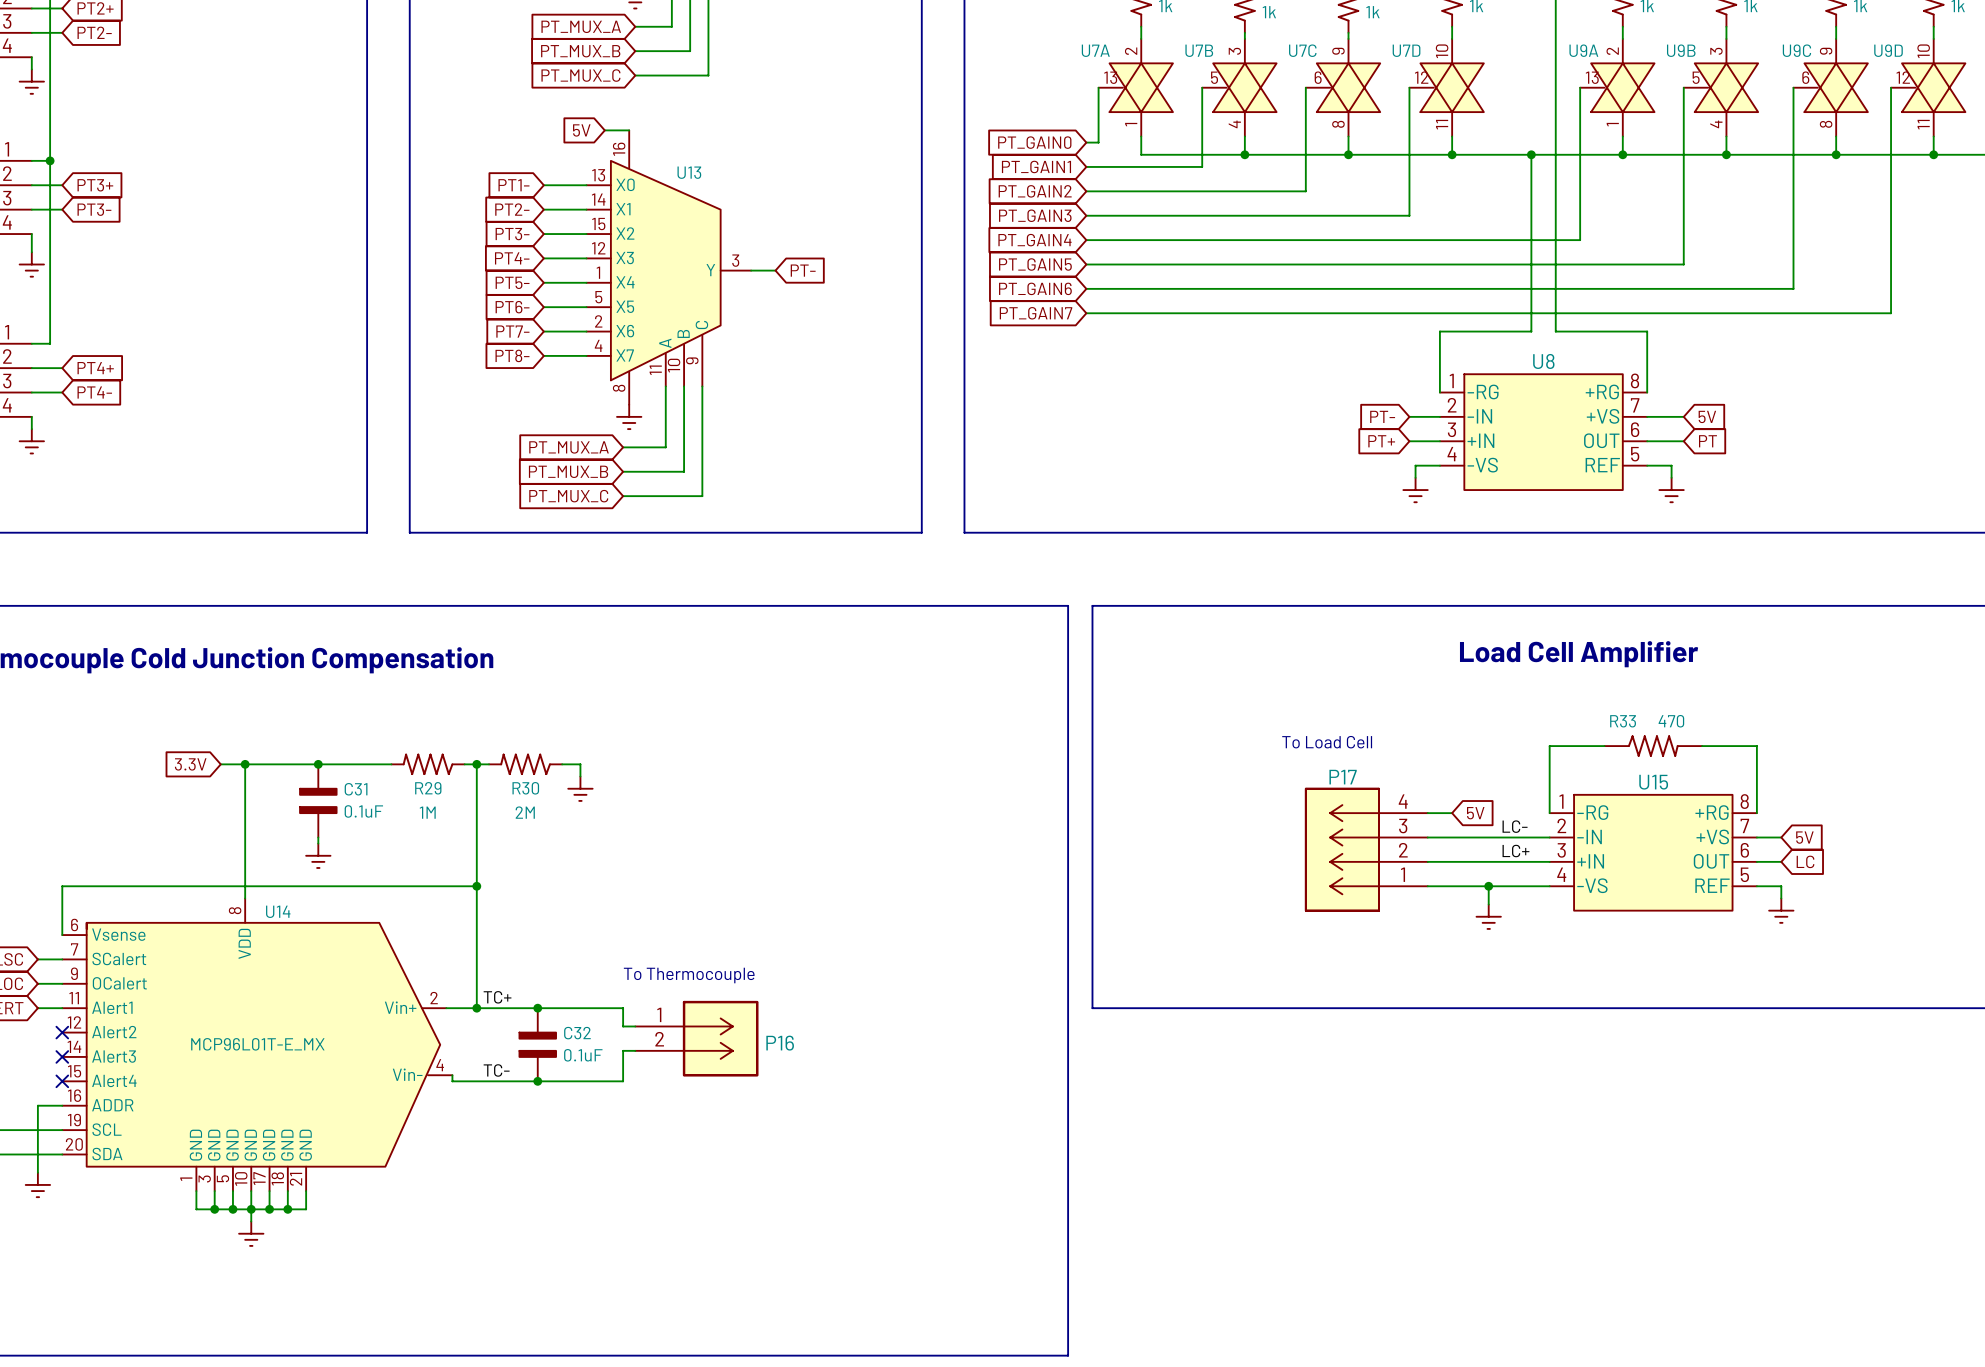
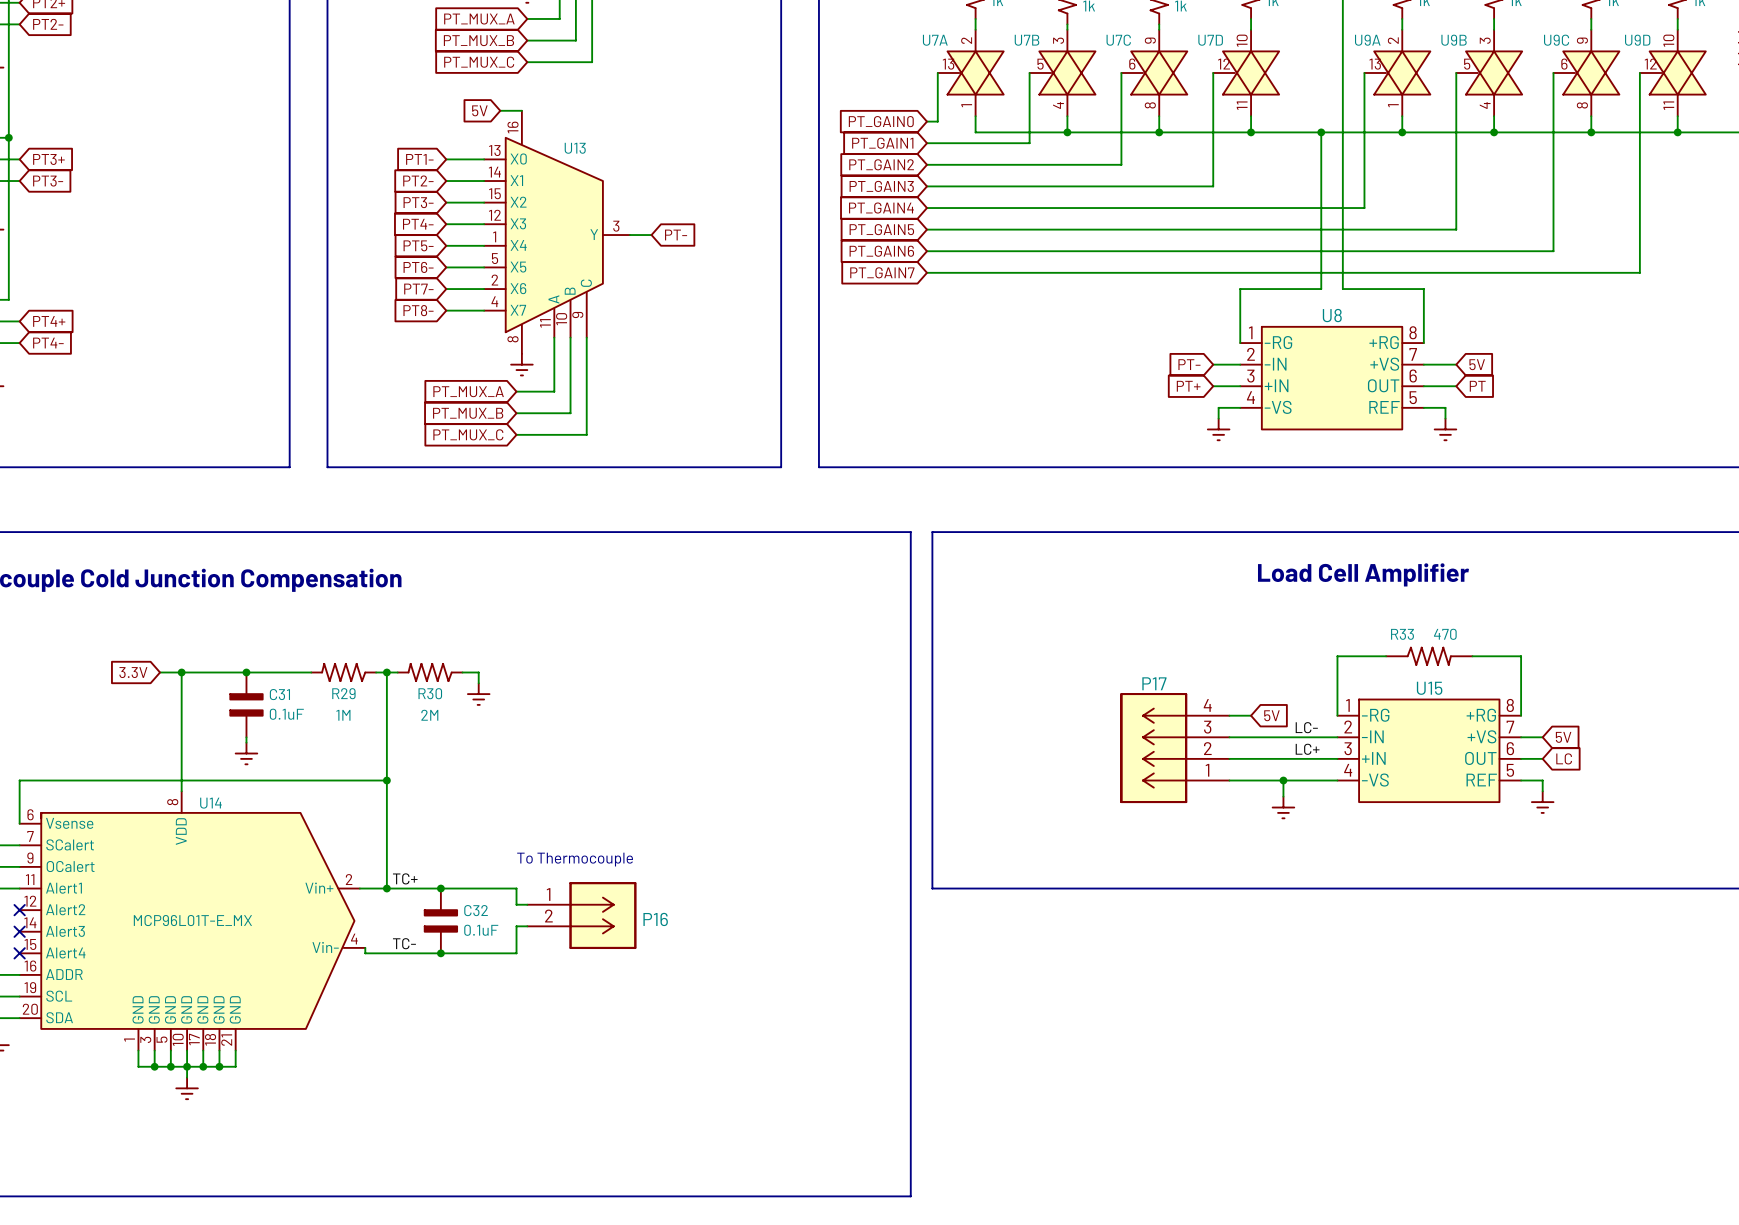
text: To Load Cell (1327, 742) -> none

